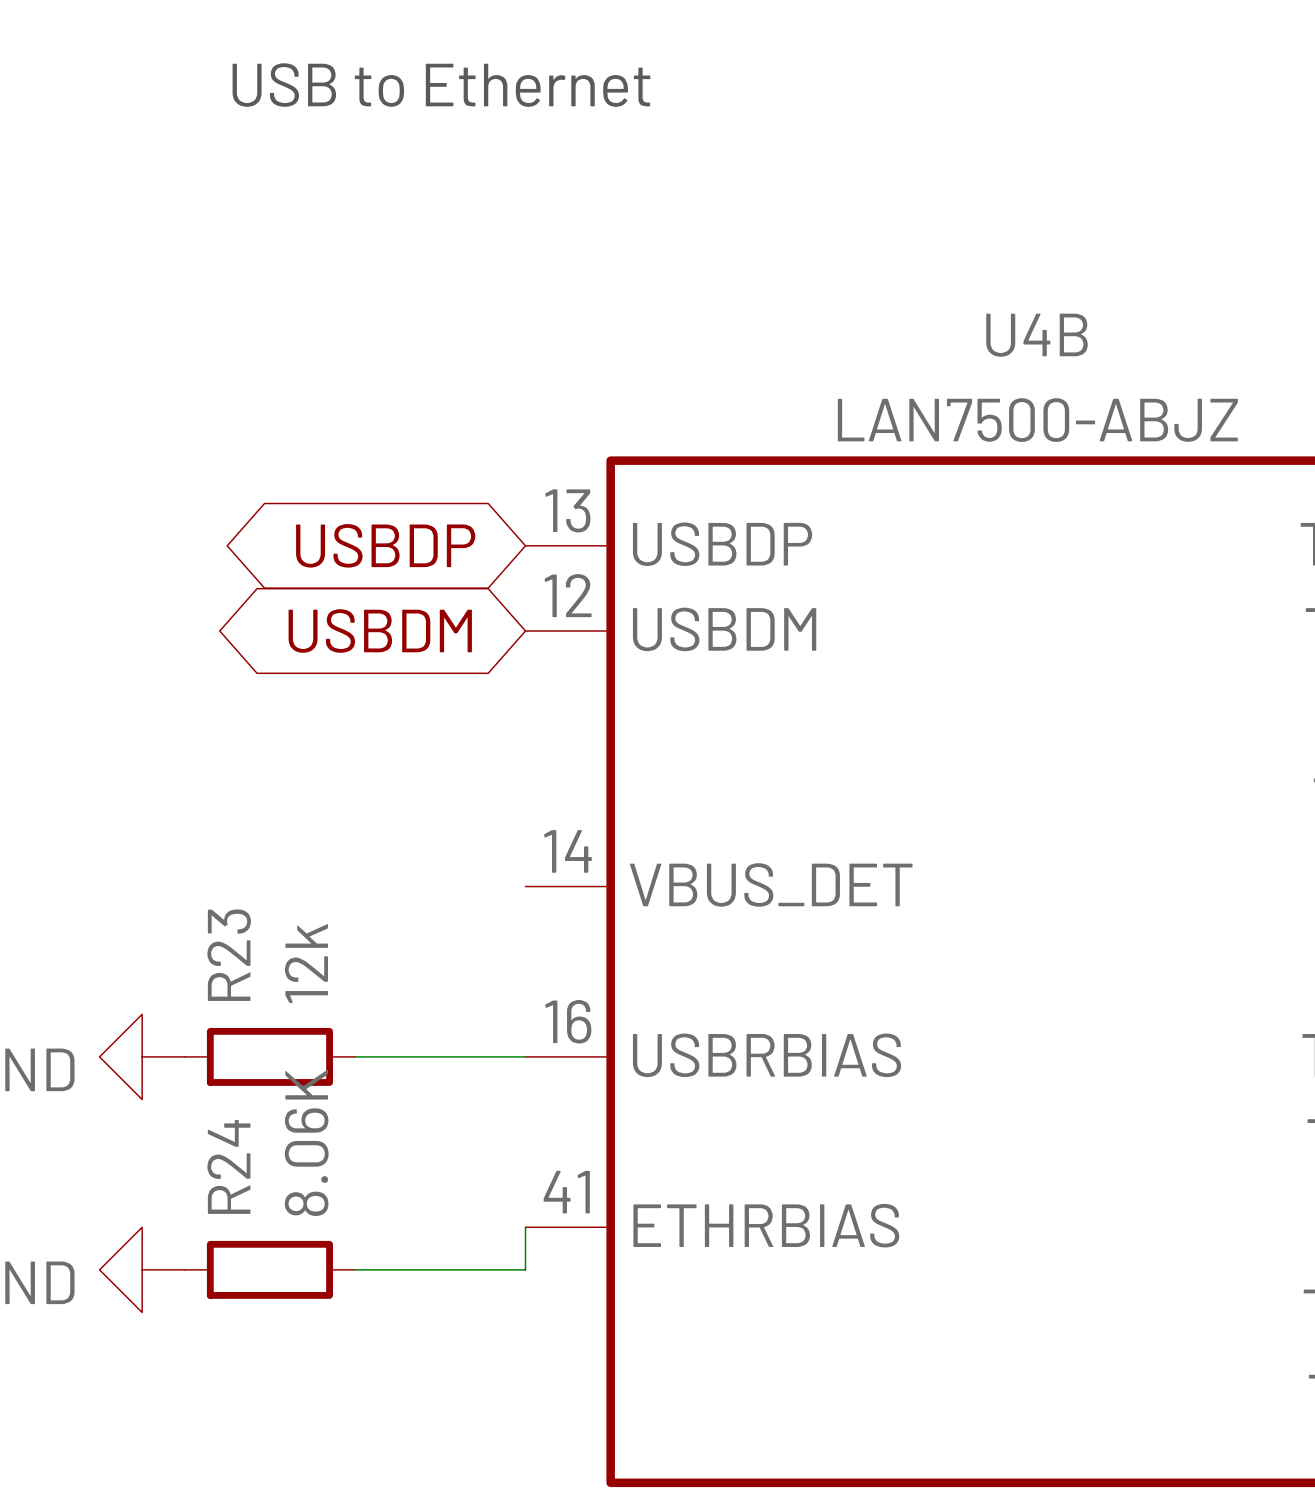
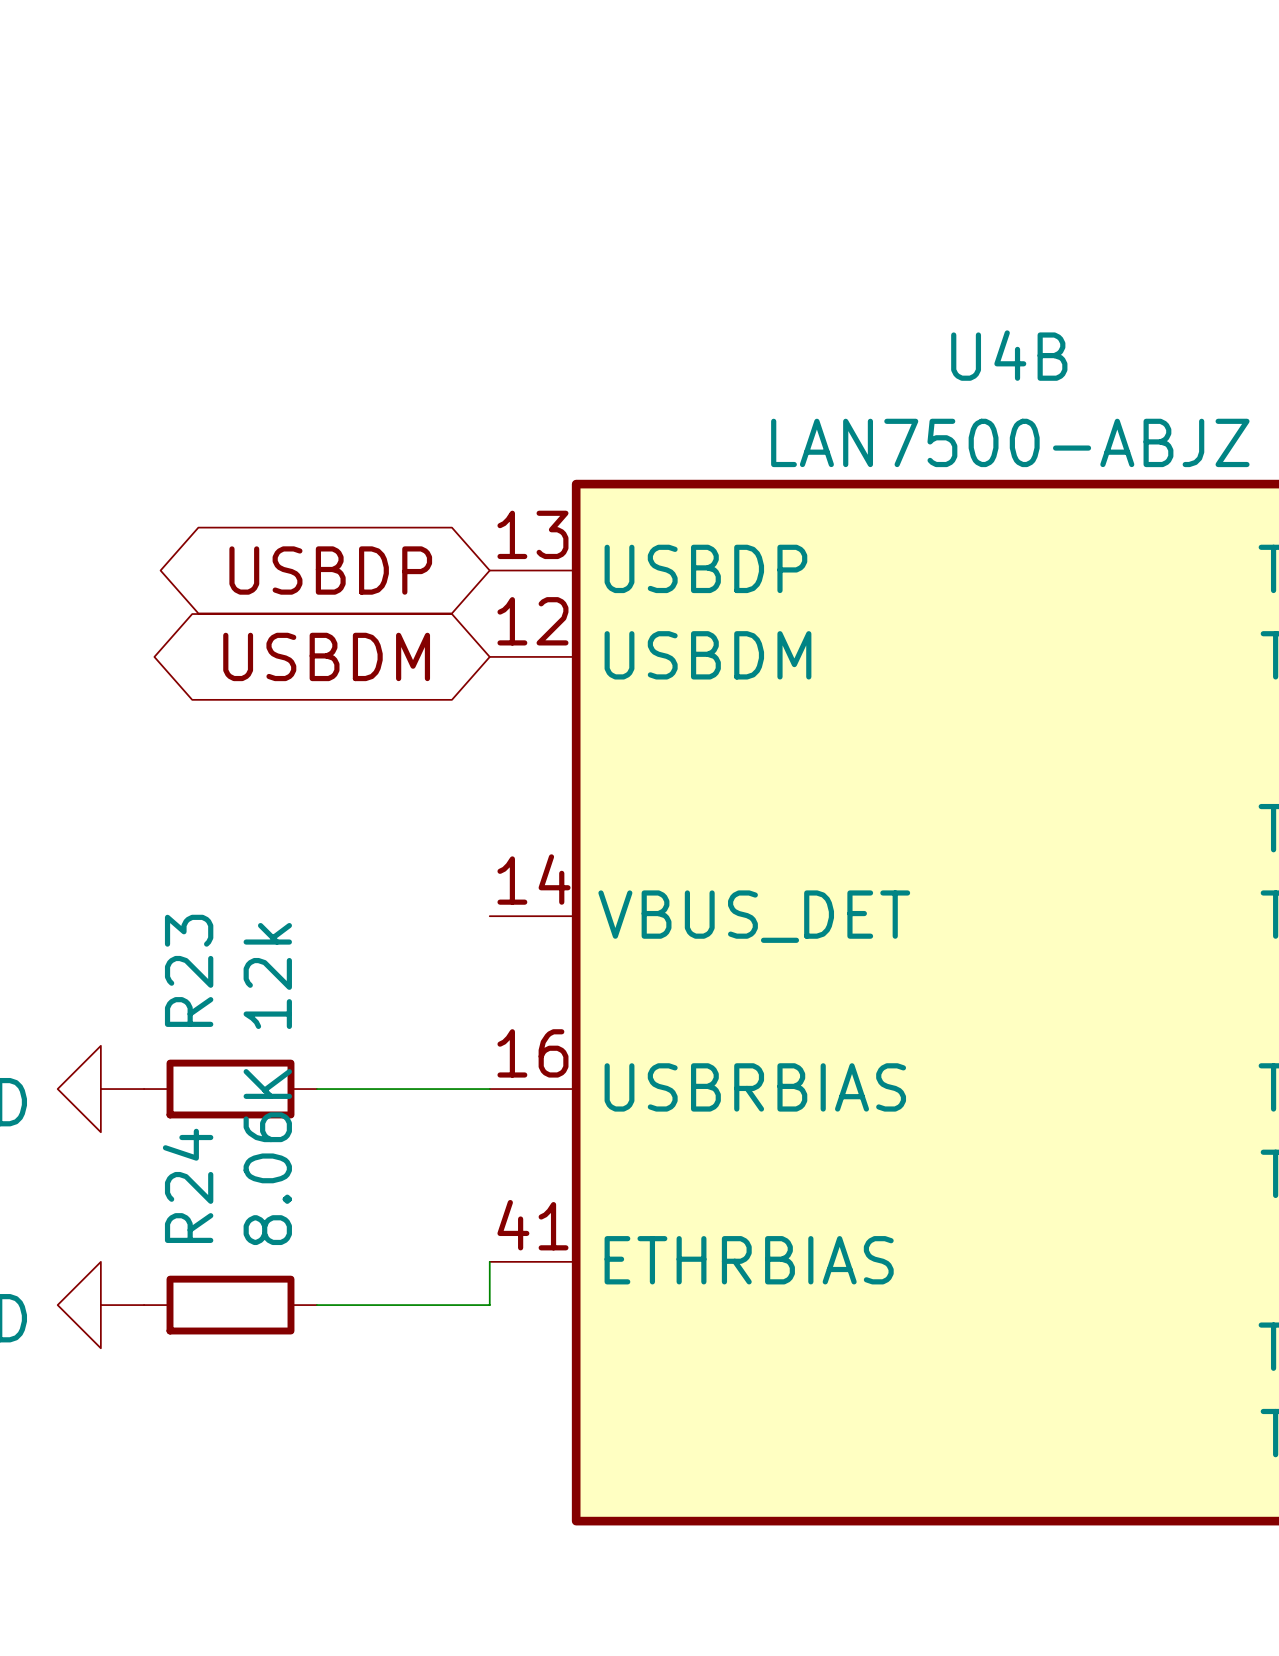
text: USB to Ethernet (441, 85) -> none

